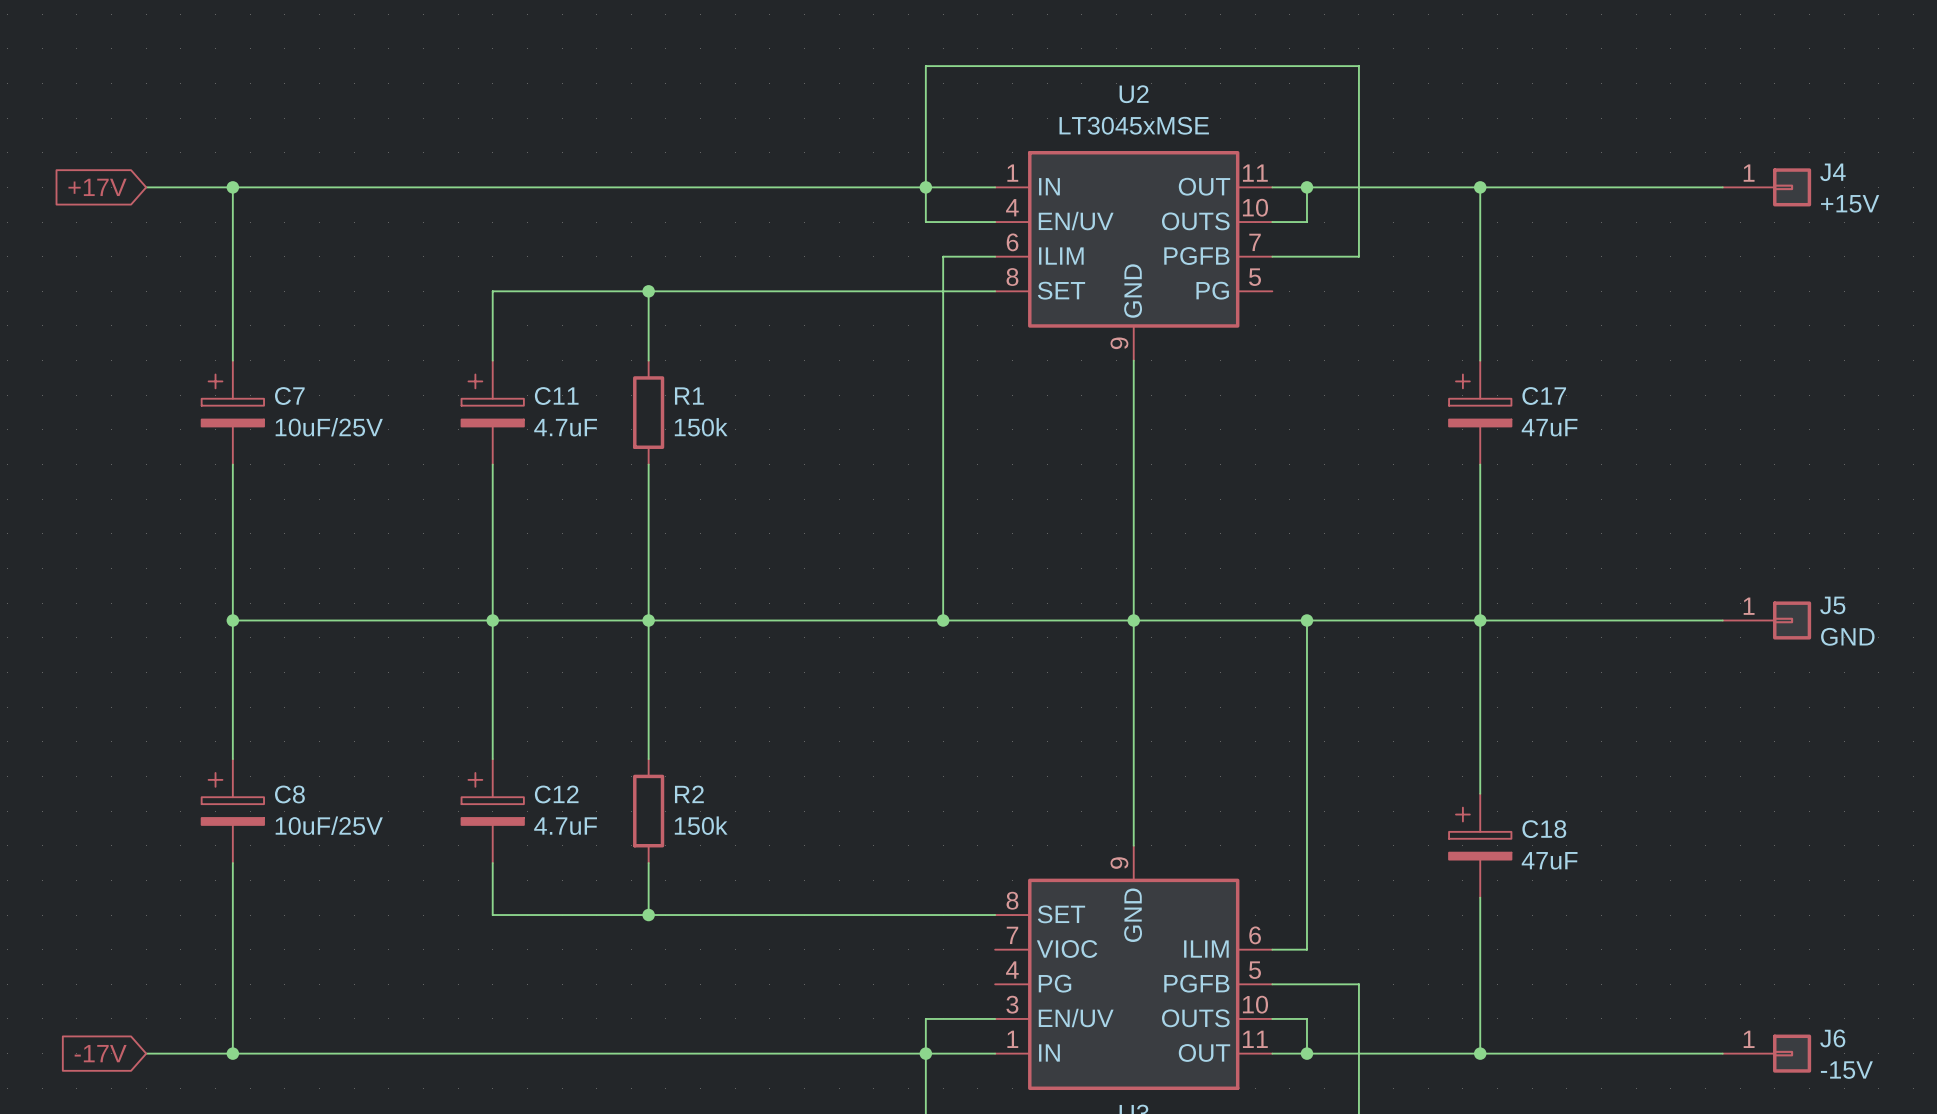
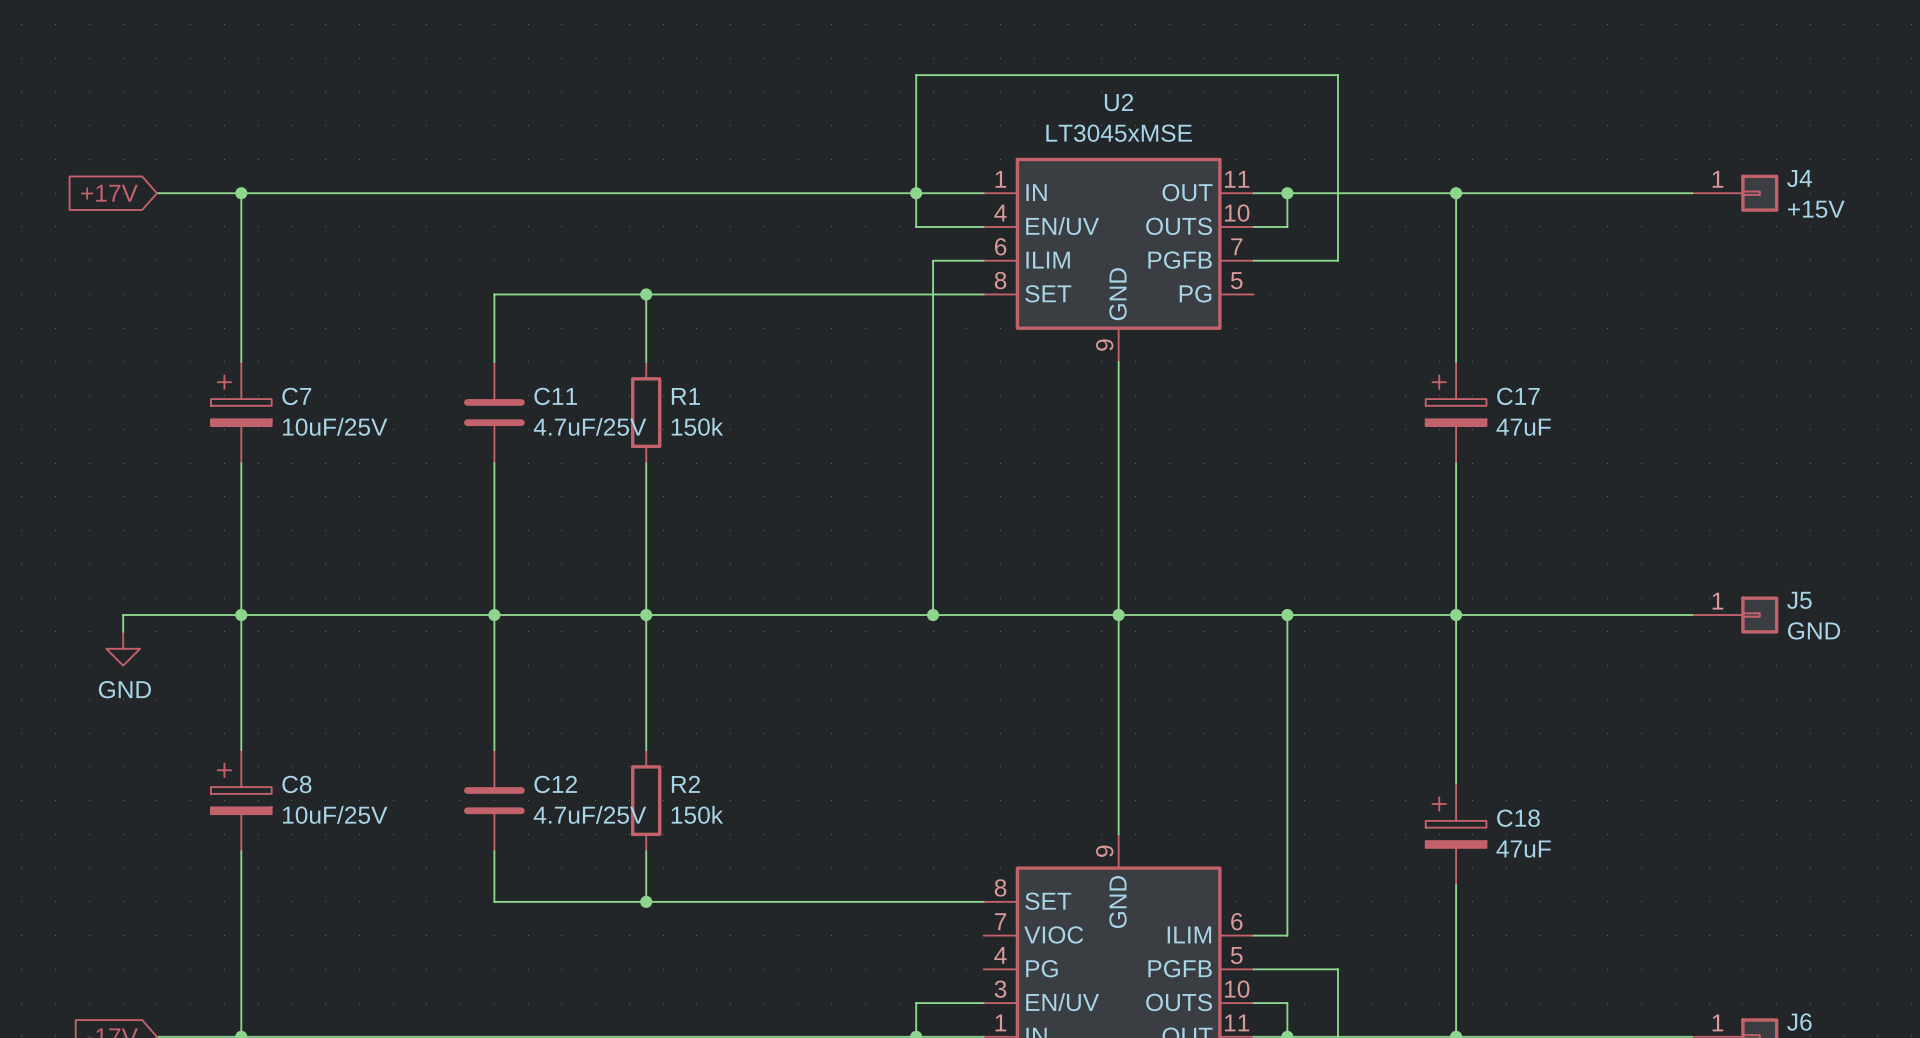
C11 symbol: [461, 360, 524, 465] -> [464, 361, 525, 464]
C11 value: 4.7uF (565, 427) -> 4.7uF/25V (590, 426)
wire: none -> (241, 615) (123, 615) (123, 631)
power symbol: none -> GND (123, 648)
C12 symbol: [461, 759, 524, 864] -> [464, 750, 525, 852]
C12 value: 4.7uF (565, 826) -> 4.7uF/25V (590, 814)

